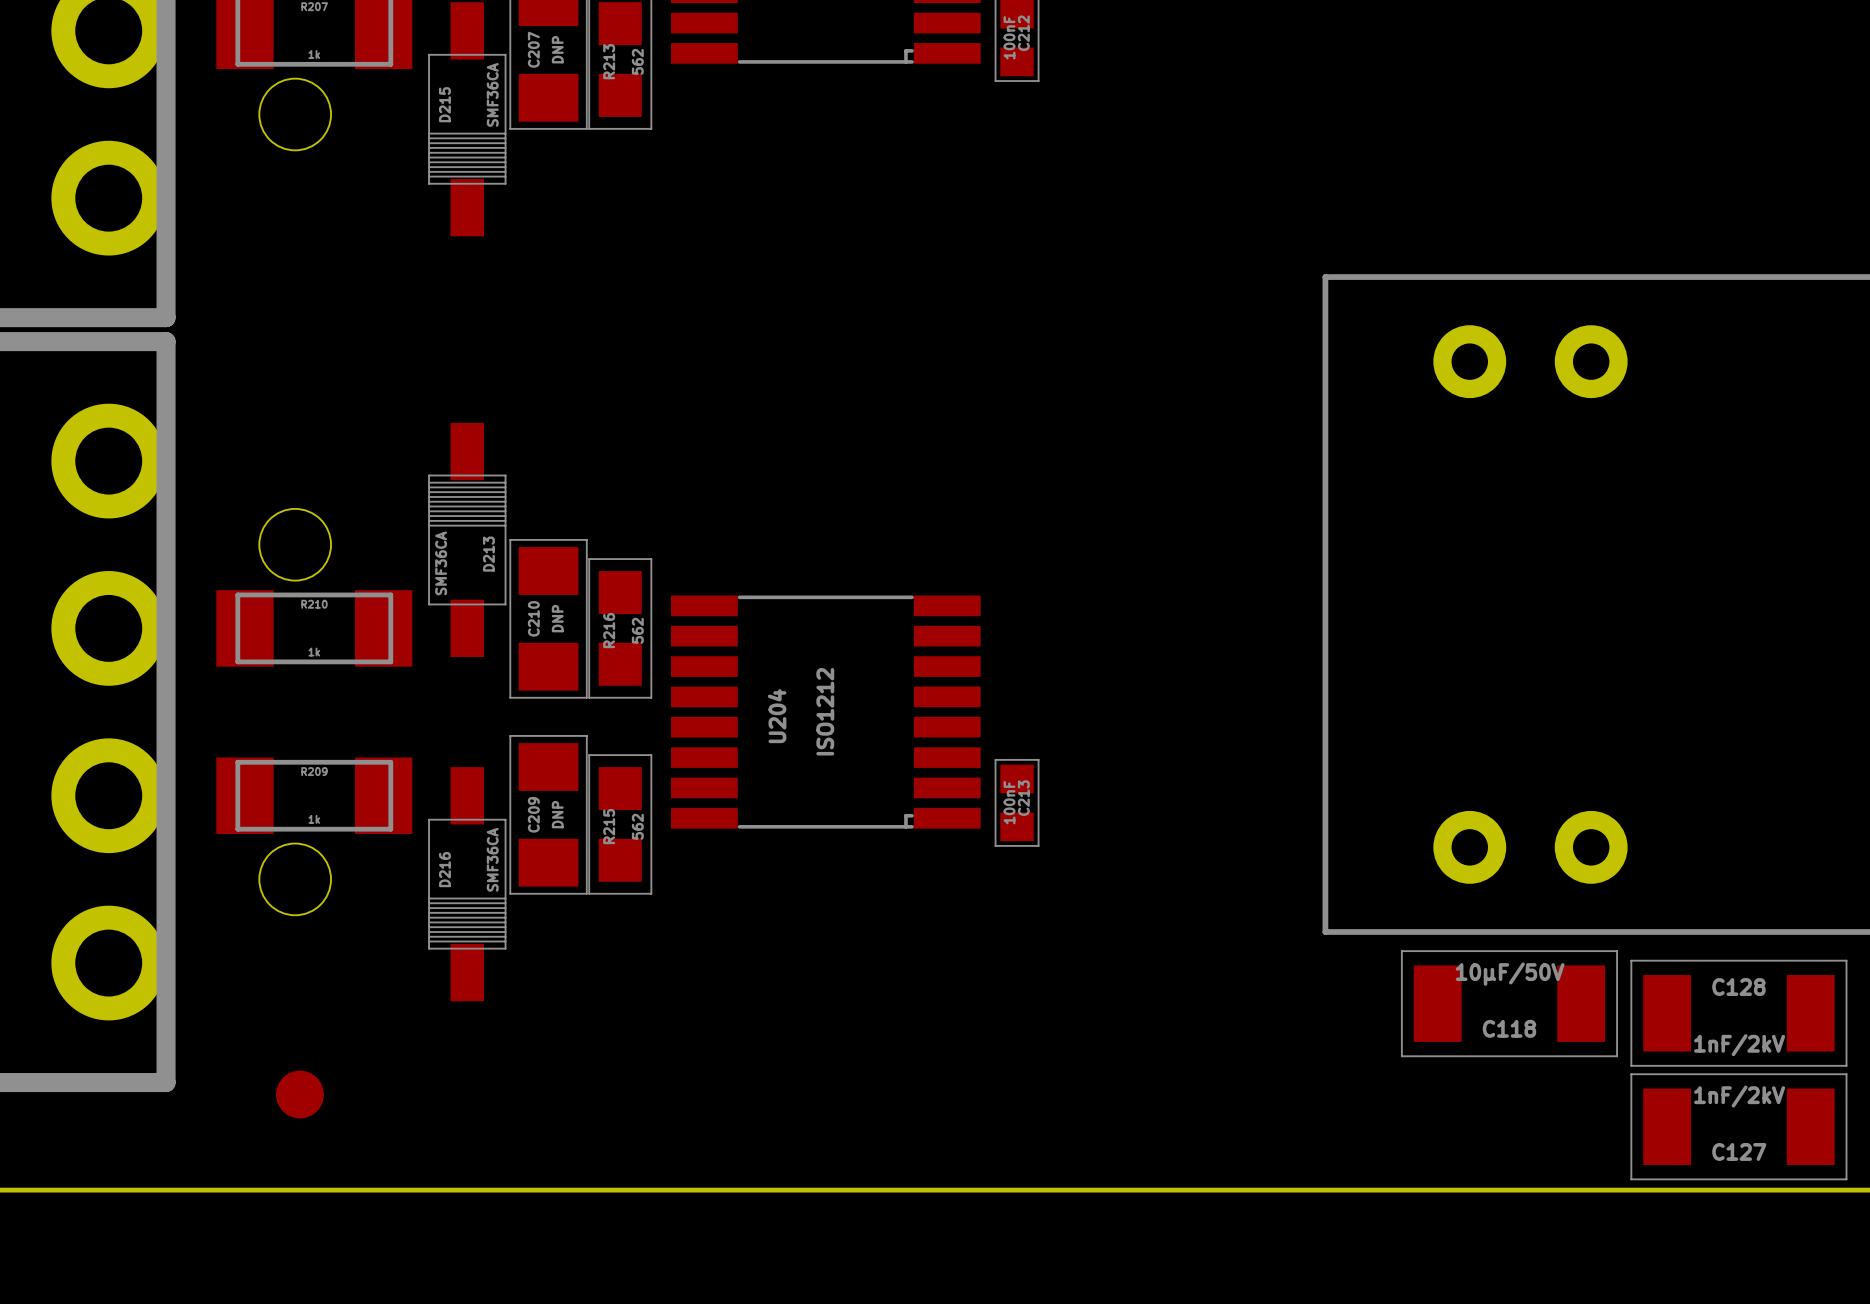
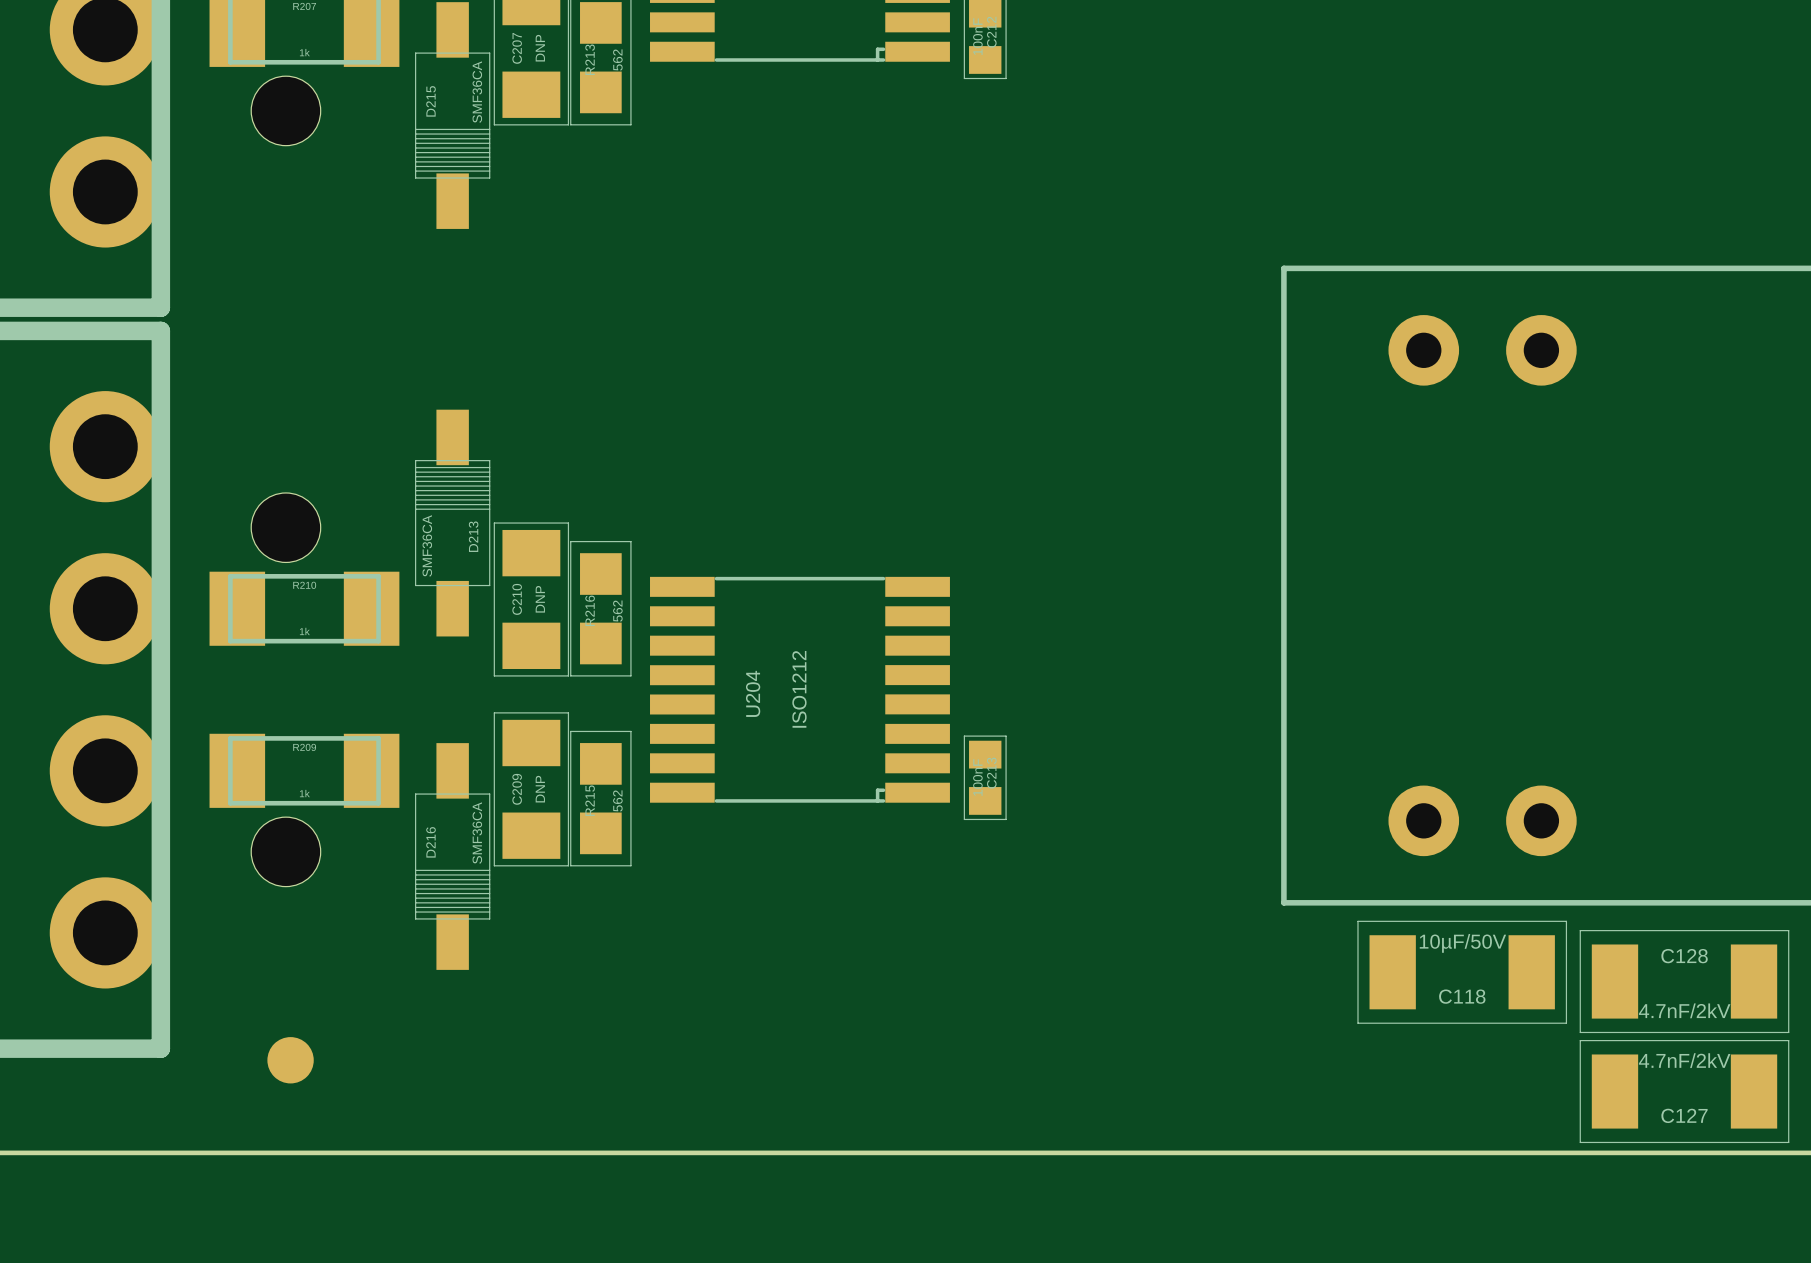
C128 value: 1nF/2kV (1739, 1045) -> 4.7nF/2kV (1684, 1010)
C127 value: 1nF/2kV (1739, 1096) -> 4.7nF/2kV (1684, 1060)

